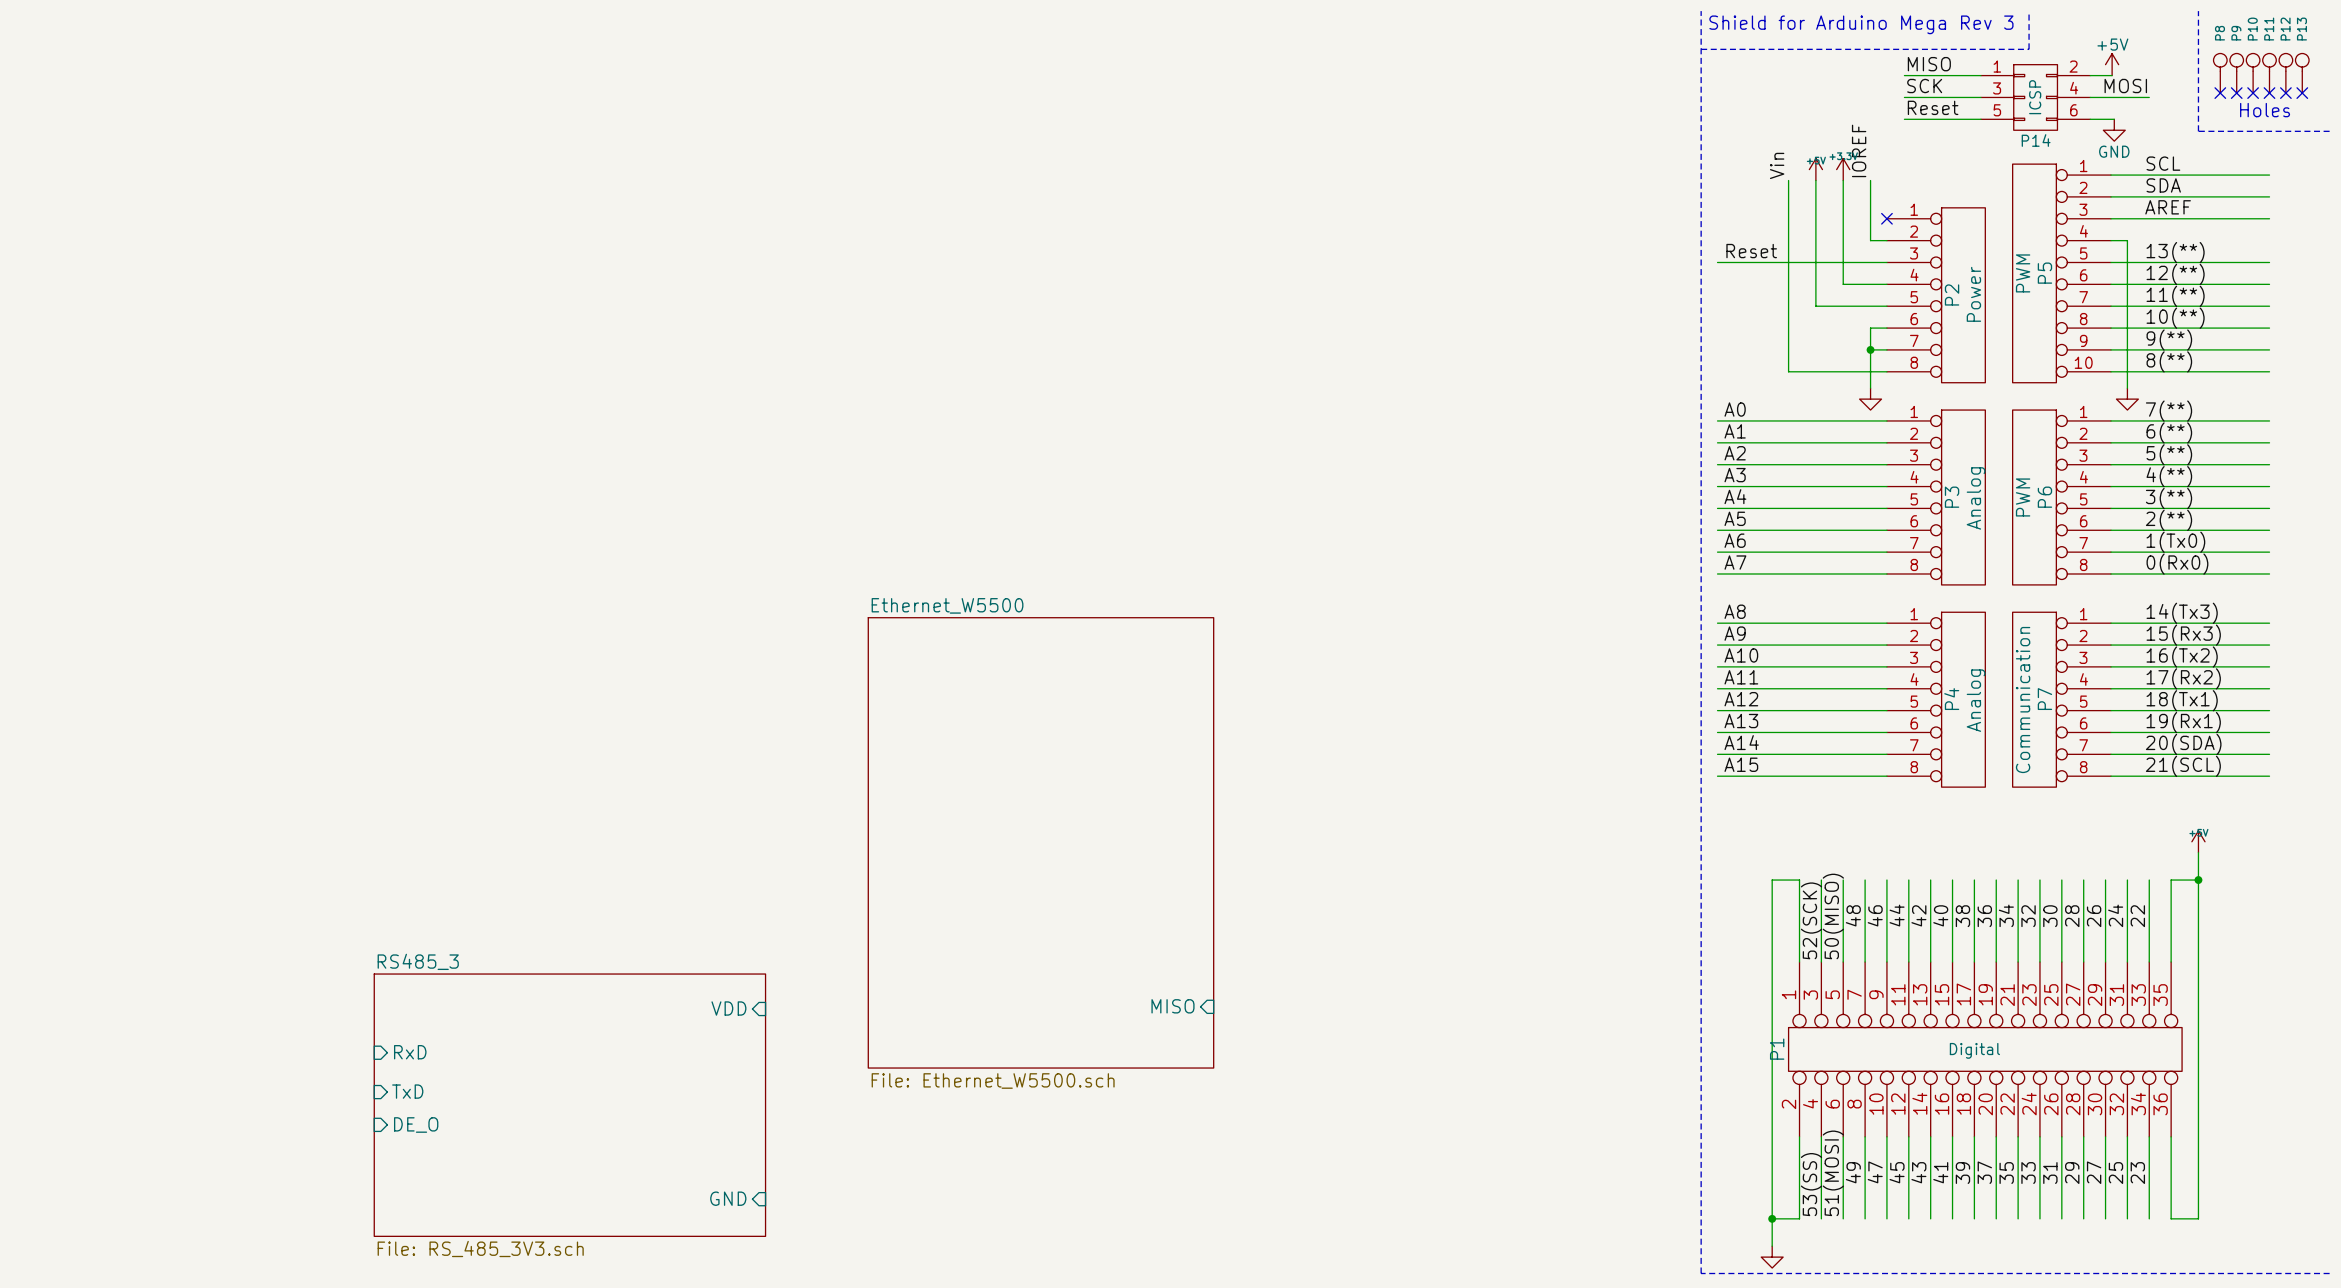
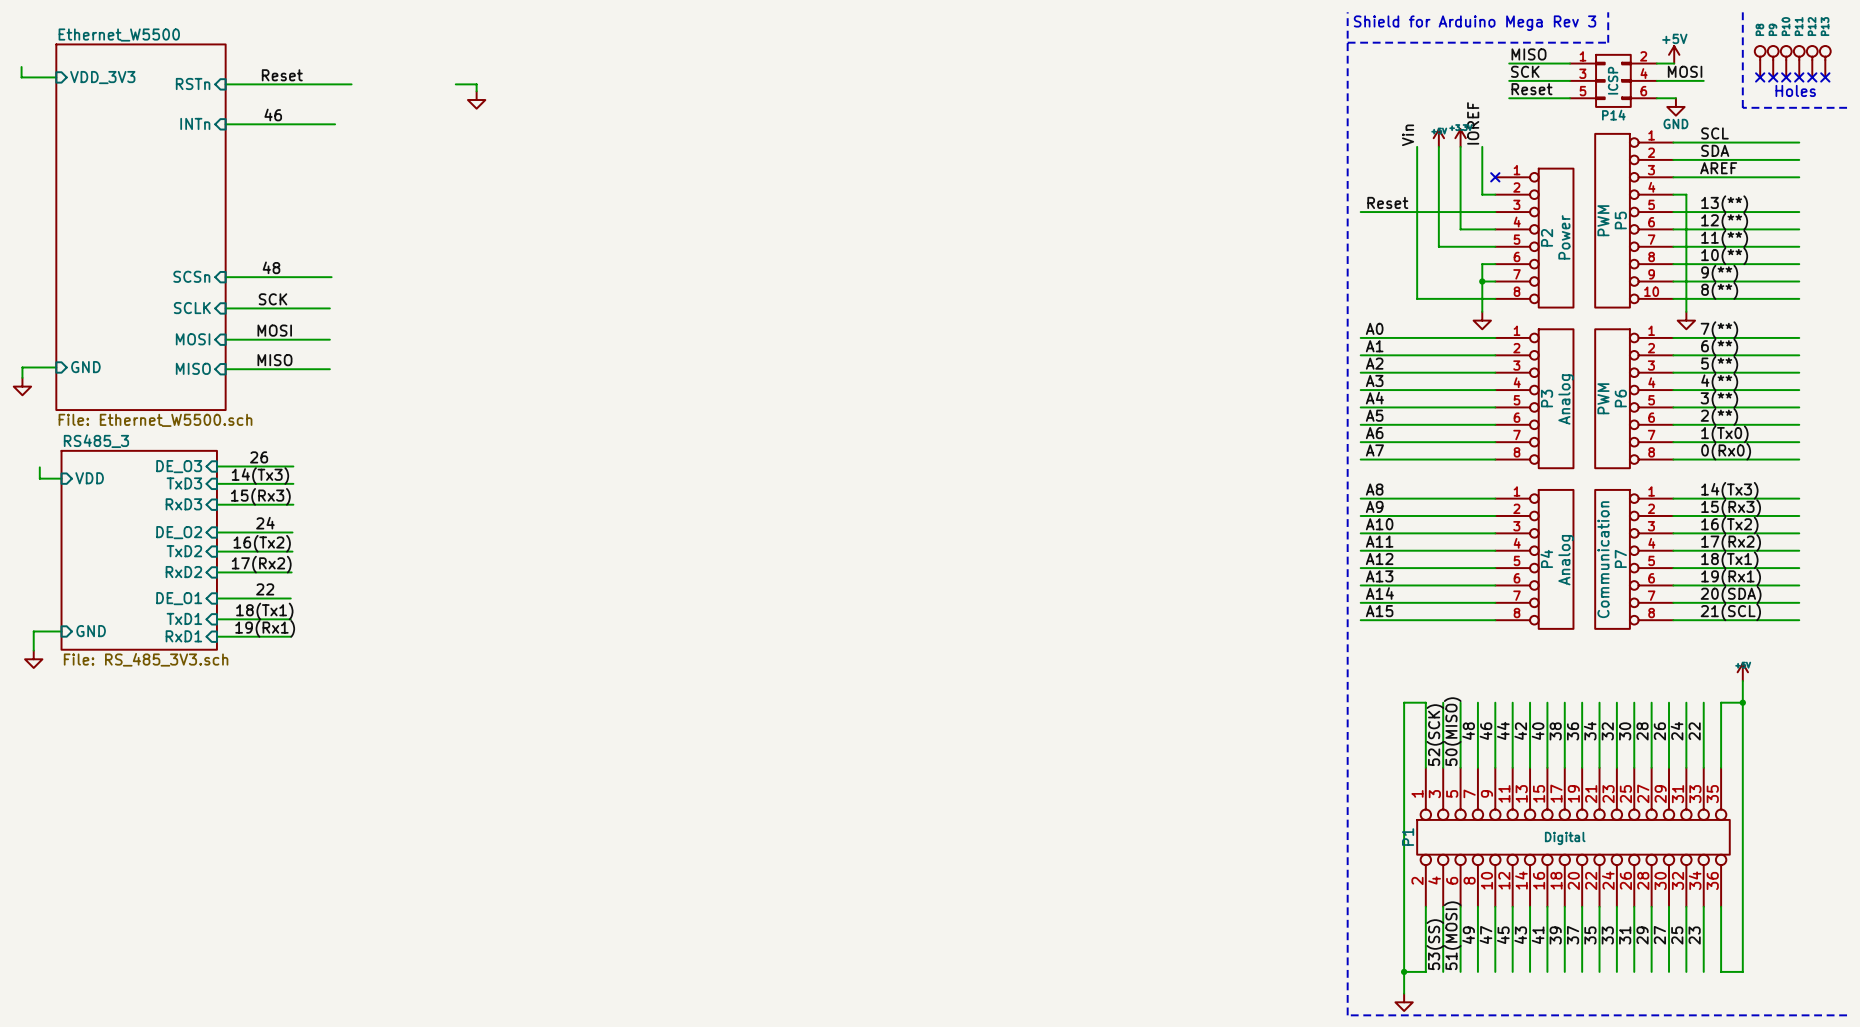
wire: none -> (21, 67) (21, 77) (56, 77)
label: none -> Reset (282, 75)
sheet pin: none -> VDD_3V3 (102, 77)
sheet pin: none -> RSTn (193, 83)
wire: none -> (225, 84) (351, 84)
wire: none -> (455, 84) (476, 84) (476, 91)
power symbol: none -> (476, 100)
label: none -> 46 (273, 114)
sheet pin: none -> INTn (195, 123)
wire: none -> (225, 124) (335, 124)
label: none -> 48 (271, 267)
sheet pin: none -> SCSn (191, 276)
wire: none -> (225, 277) (331, 277)
label: none -> SCK (272, 299)
sheet pin: none -> SCLK (192, 308)
wire: none -> (225, 308) (329, 308)
label: none -> MOSI (274, 330)
sheet pin: none -> MOSI (193, 339)
wire: none -> (225, 339) (329, 339)
label: none -> MISO (274, 360)
sheet pin: none -> GND (85, 367)
wire: none -> (56, 367) (22, 367) (22, 377)
sheet pin: none -> MISO (193, 368)
wire: none -> (225, 369) (329, 369)
power symbol: none -> (22, 386)
label: none -> 26 (259, 457)
sheet pin: none -> DE_O3 (179, 466)
wire: none -> (216, 466) (293, 466)
wire: none -> (39, 467) (39, 478) (61, 478)
label: none -> 14(Tx3) (260, 476)
sheet pin: none -> VDD (89, 478)
sheet pin: none -> TxD3 (184, 483)
wire: none -> (216, 483) (293, 483)
sheet Ethernet_W5500 name position: Ethernet_W5500 (947, 605) -> Ethernet_W5500 (119, 35)
sheet Ethernet_W5500 shape: [868, 617, 1214, 1069] -> [56, 44, 226, 411]
label: none -> 15(Rx3) (260, 496)
sheet pin: none -> RxD3 (183, 504)
wire: none -> (216, 504) (293, 504)
label: none -> 24 (265, 523)
sheet pin: none -> DE_O2 (179, 532)
wire: none -> (216, 532) (292, 532)
label: none -> 16(Tx2) (262, 543)
sheet pin: none -> TxD2 (184, 551)
wire: none -> (216, 551) (292, 551)
label: none -> 17(Rx2) (261, 564)
sheet pin: none -> RxD2 (183, 572)
wire: none -> (216, 572) (291, 572)
label: none -> 22 (265, 589)
wire: none -> (216, 598) (290, 598)
sheet pin: none -> DE_O1 (179, 598)
label: none -> 18(Tx1) (264, 611)
sheet pin: none -> TxD1 (184, 618)
wire: none -> (216, 619) (290, 619)
label: none -> 19(Rx1) (265, 628)
sheet pin: none -> GND (91, 631)
wire: none -> (61, 631) (33, 631) (33, 650)
sheet pin: none -> RxD1 (183, 636)
wire: none -> (216, 636) (290, 636)
power symbol: none -> (33, 659)
sheet RS485_3 name position: RS485_3 (418, 961) -> RS485_3 (96, 441)
sheet RS485_3 shape: [374, 974, 766, 1237] -> [61, 450, 217, 650]
sheet pin: MISO (1172, 1006) -> none
sheet pin: VDD (728, 1008) -> none
sheet pin: RxD (410, 1052) -> none
sheet Ethernet_W5500 value position: File: Ethernet_W5500.sch (993, 1080) -> File: Ethernet_W5500.sch (155, 420)
sheet pin: TxD (407, 1091) -> none
sheet pin: DE_O (416, 1124) -> none
sheet pin: GND (728, 1198) -> none
sheet RS485_3 value position: File: RS_485_3V3.sch (480, 1249) -> File: RS_485_3V3.sch (146, 659)

